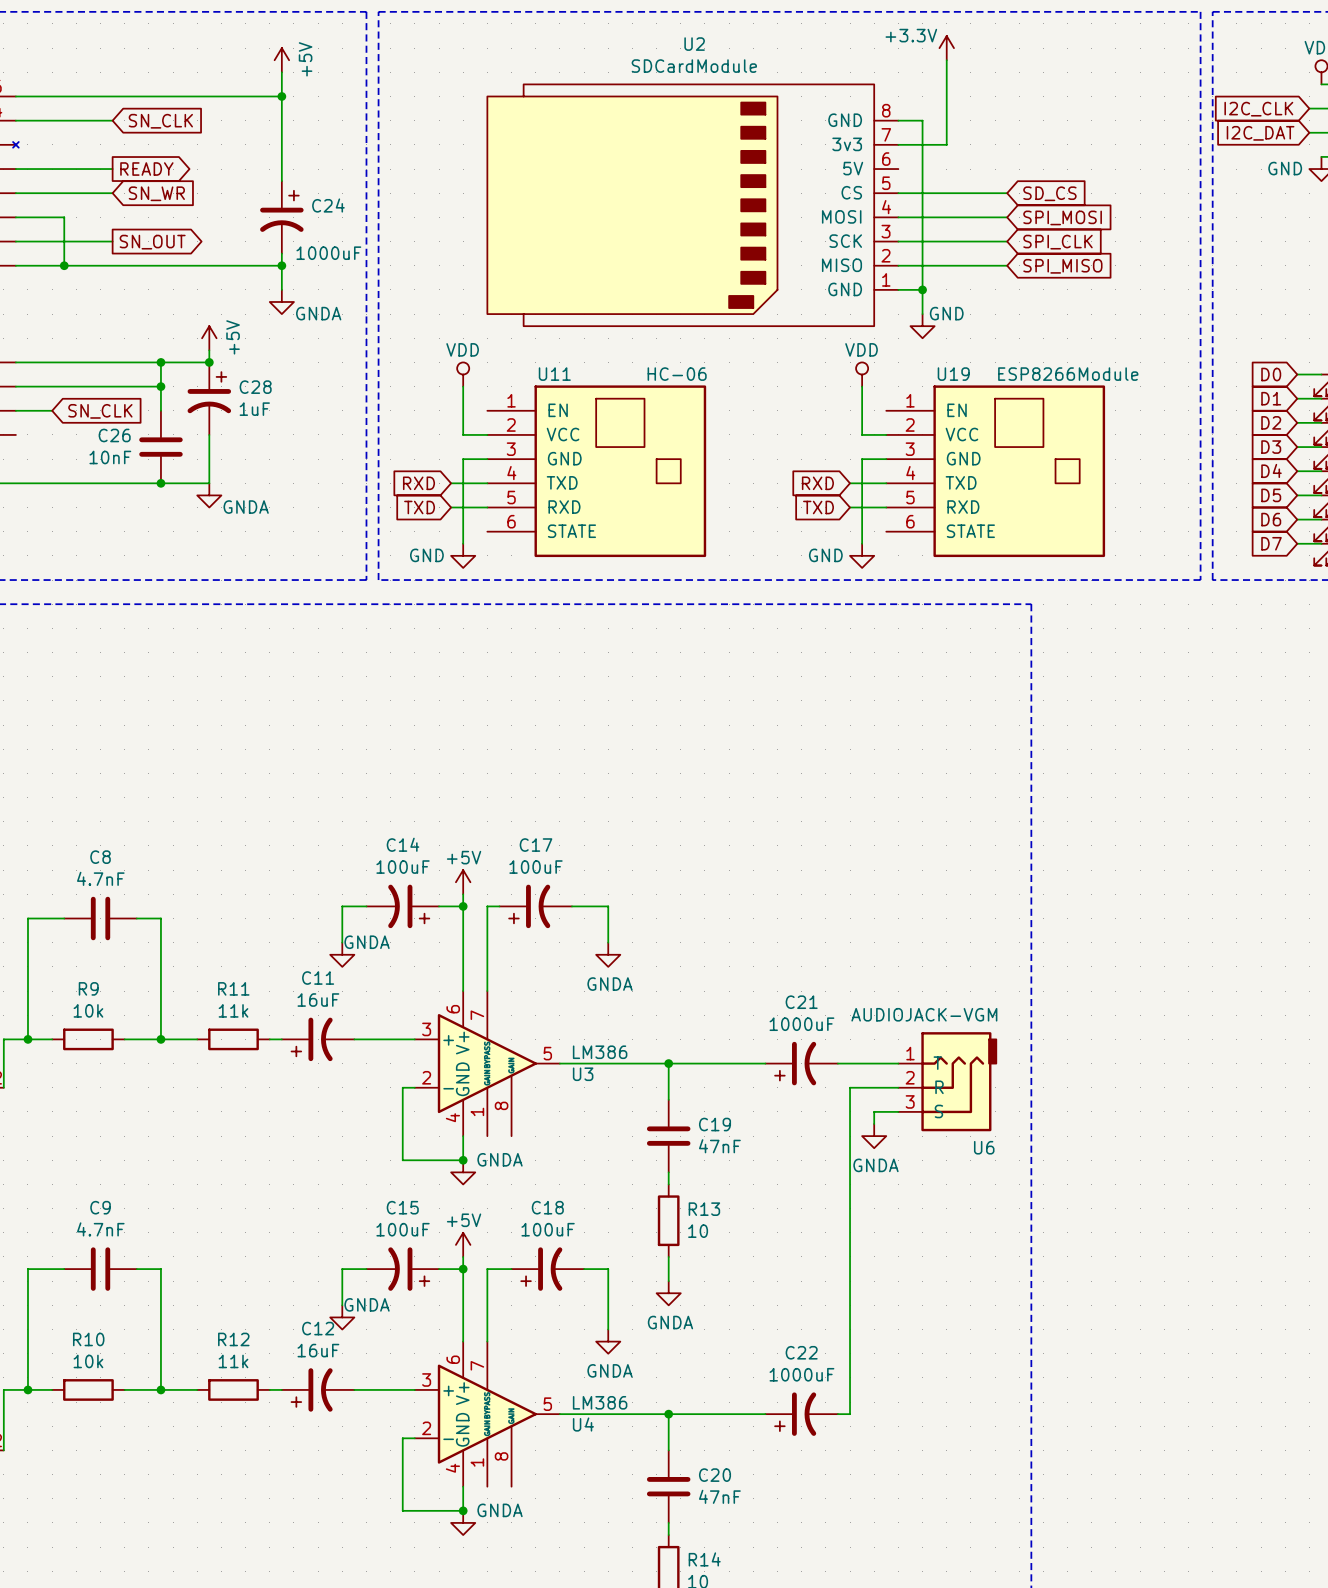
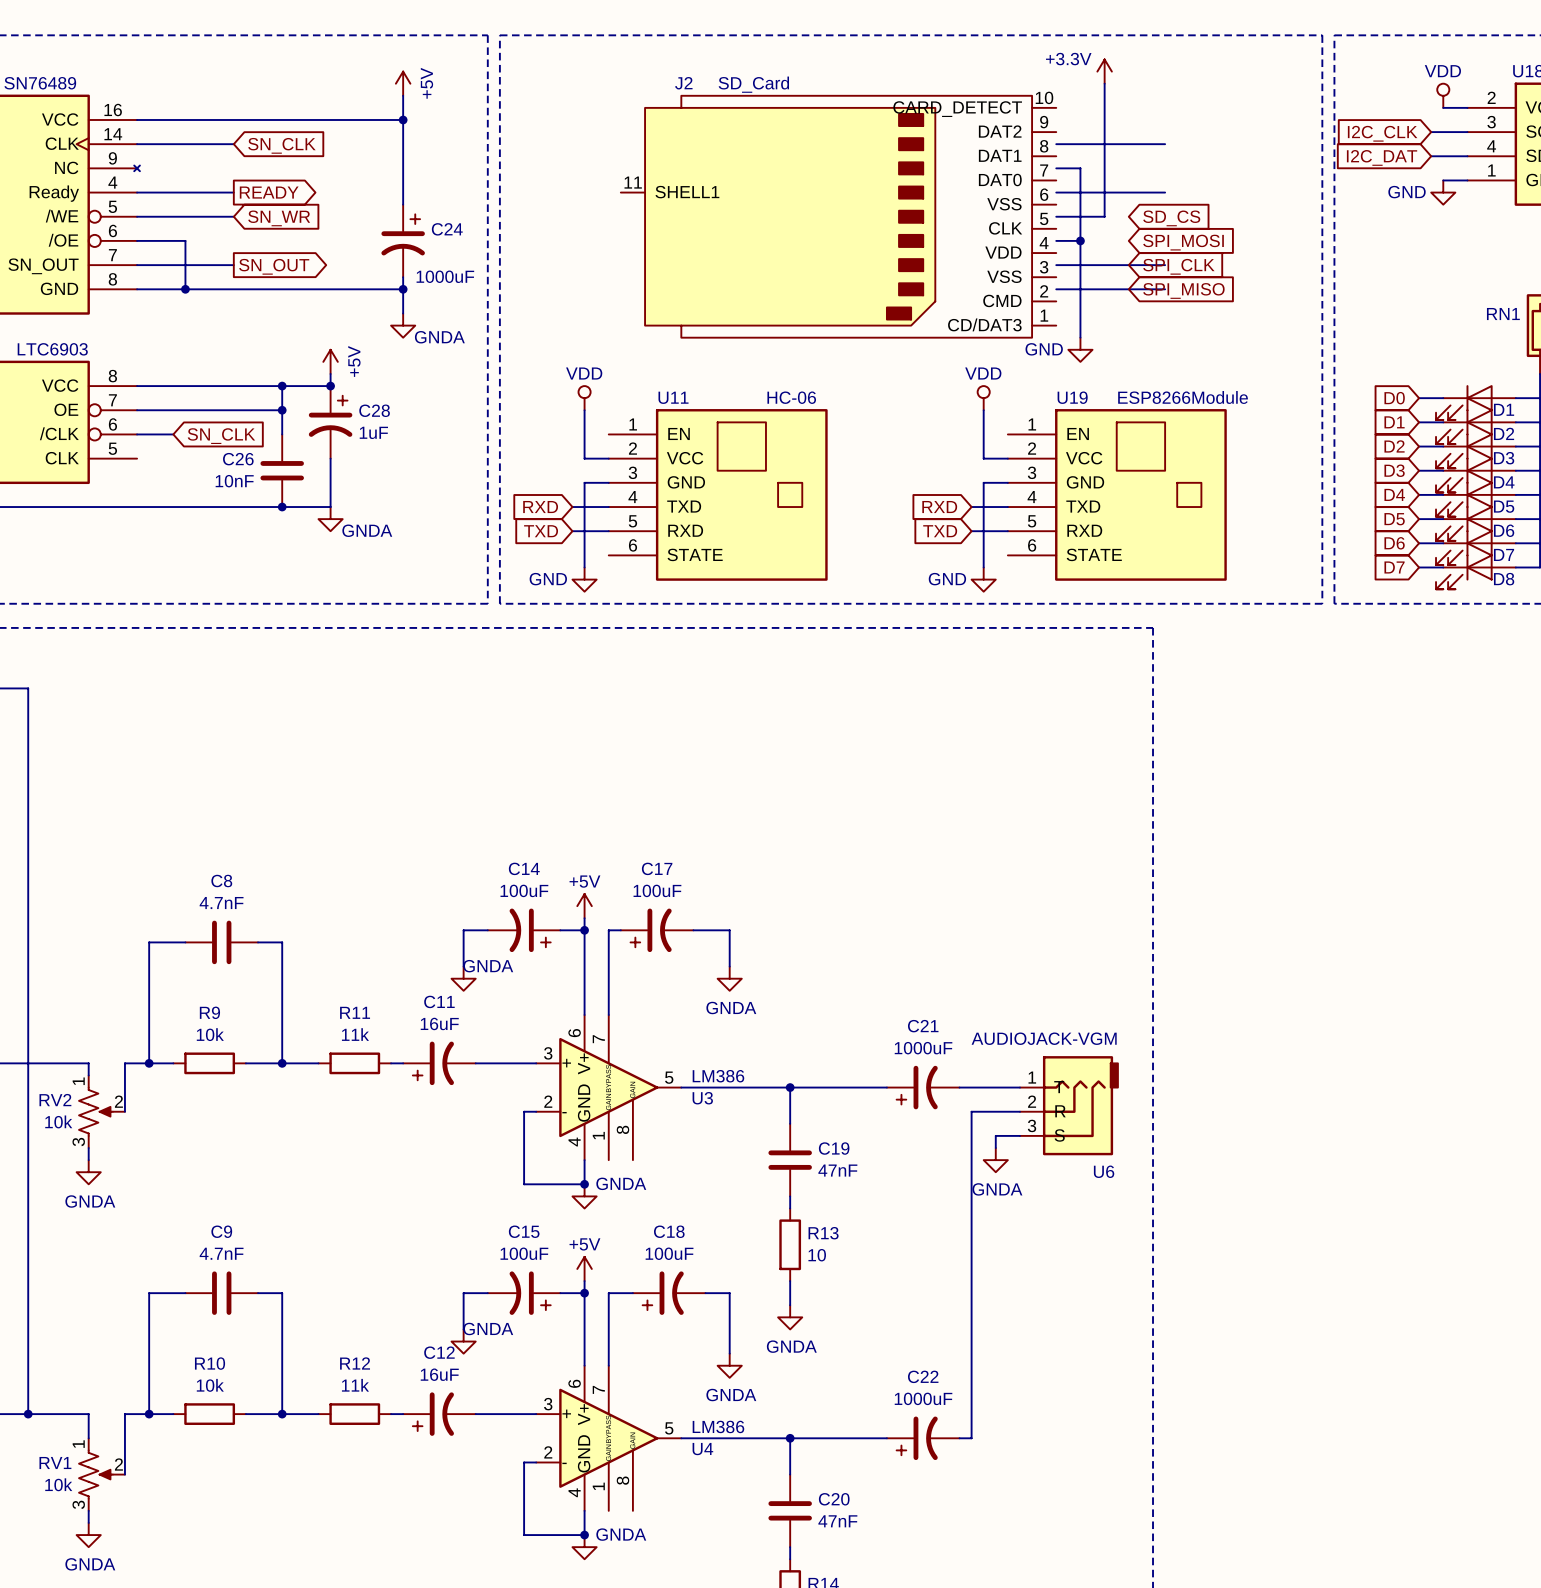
power symbol position: +3.3V (946, 48) -> +3.3V (1104, 71)
wire: (946, 60) (946, 144) -> (1080, 337) (1080, 168) (1068, 168)
wire: (898, 120) (922, 120) (922, 314) -> none
wire: none -> (1056, 144) (1165, 144)
wire: (898, 144) (934, 144) -> none
wire: none -> (1056, 192) (1165, 192)
J2: none -> SD_Card (838, 216)
wire: (898, 193) (934, 193) -> none
wire: (982, 193) (1007, 193) -> (1104, 216) (1104, 83)
U2: SDCardModule (692, 205) -> none
wire: (898, 217) (934, 217) -> none
wire: (958, 217) (1007, 217) -> none
junction: none -> (1080, 240)
wire: (898, 241) (934, 241) -> (1128, 265) (1165, 265)
wire: (898, 265) (934, 265) -> (1128, 289) (1165, 289)
wire: (898, 289) (922, 289) -> none
junction: (922, 289) -> none
power symbol text position: GND (946, 313) -> GND (1044, 349)
power symbol position: GND (922, 326) -> GND (1080, 349)

